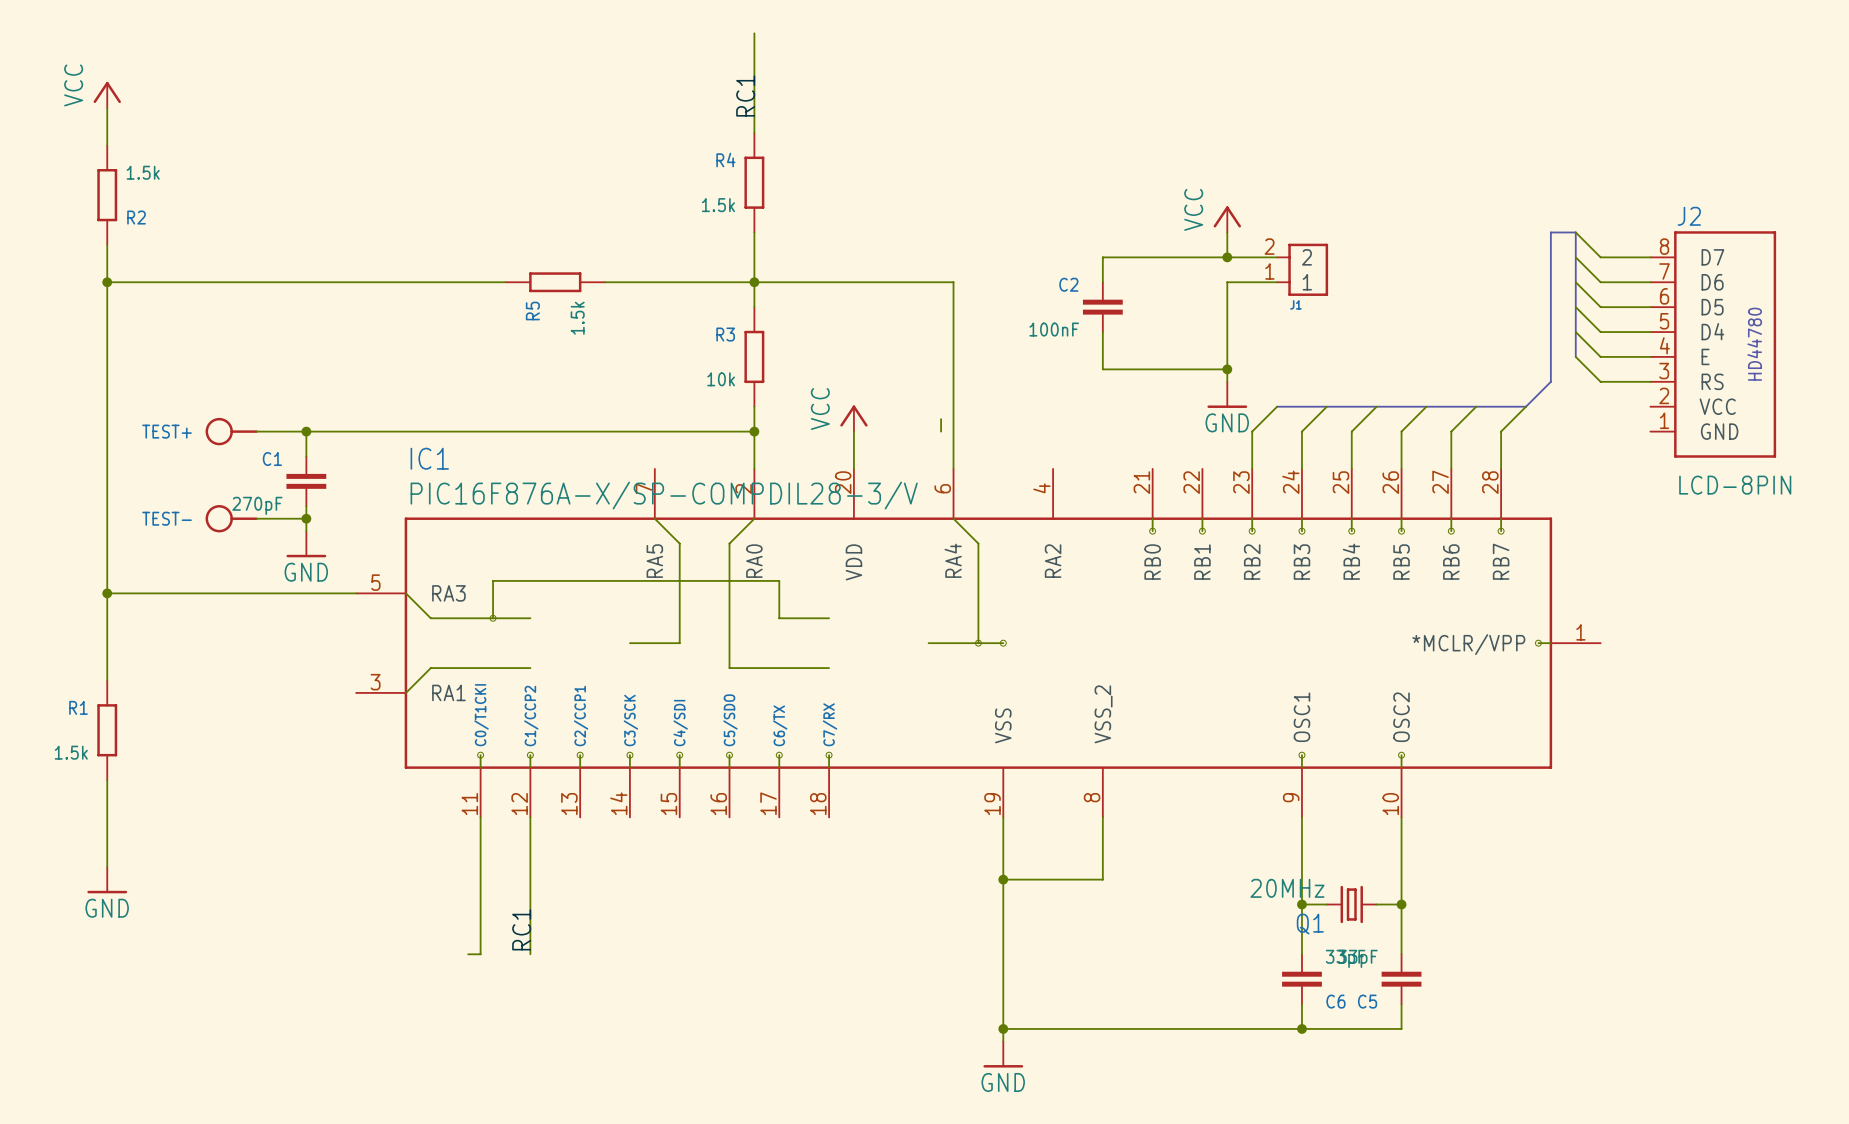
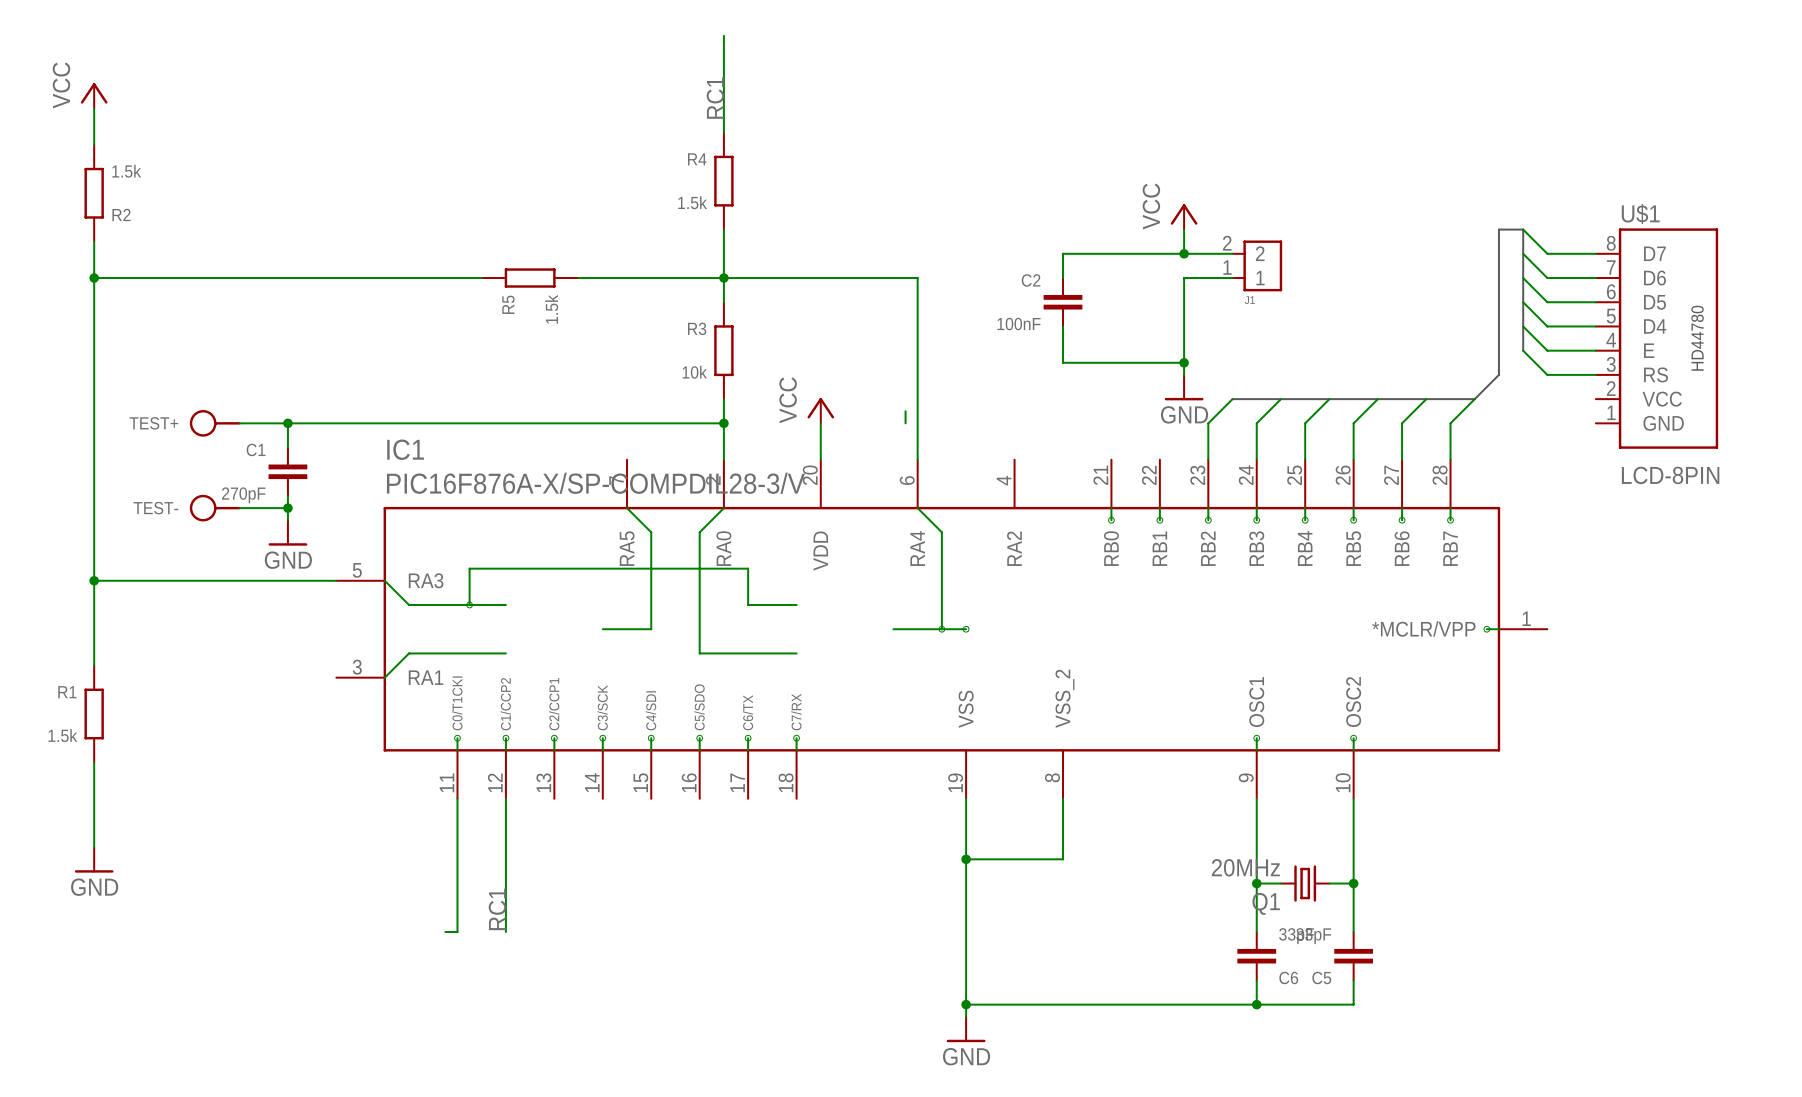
J2 name: J2 (1689, 216) -> U$1 (1640, 214)

